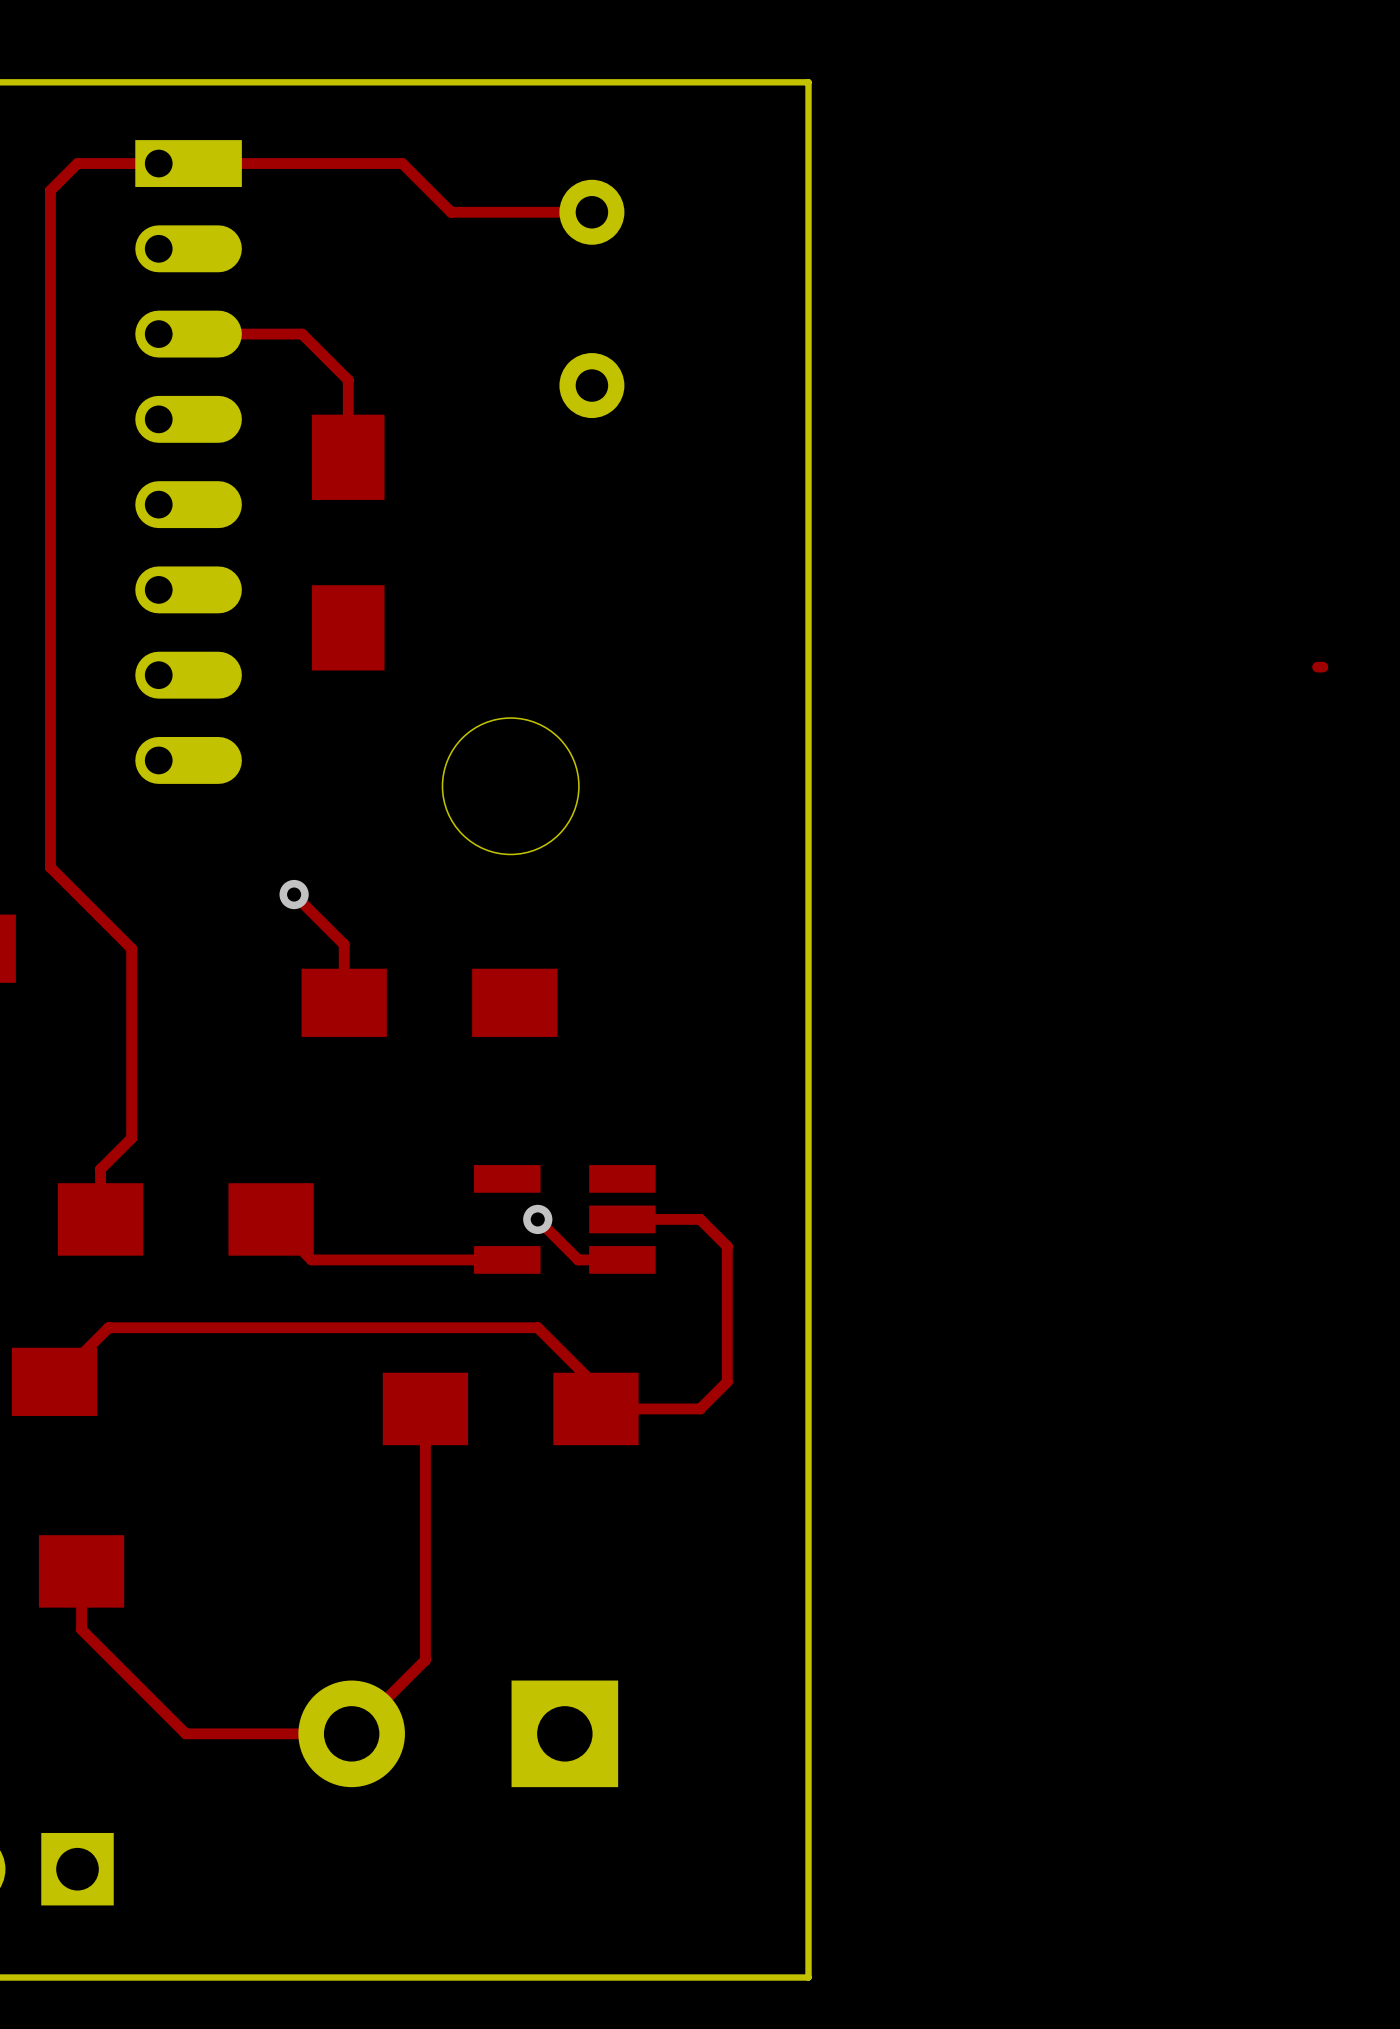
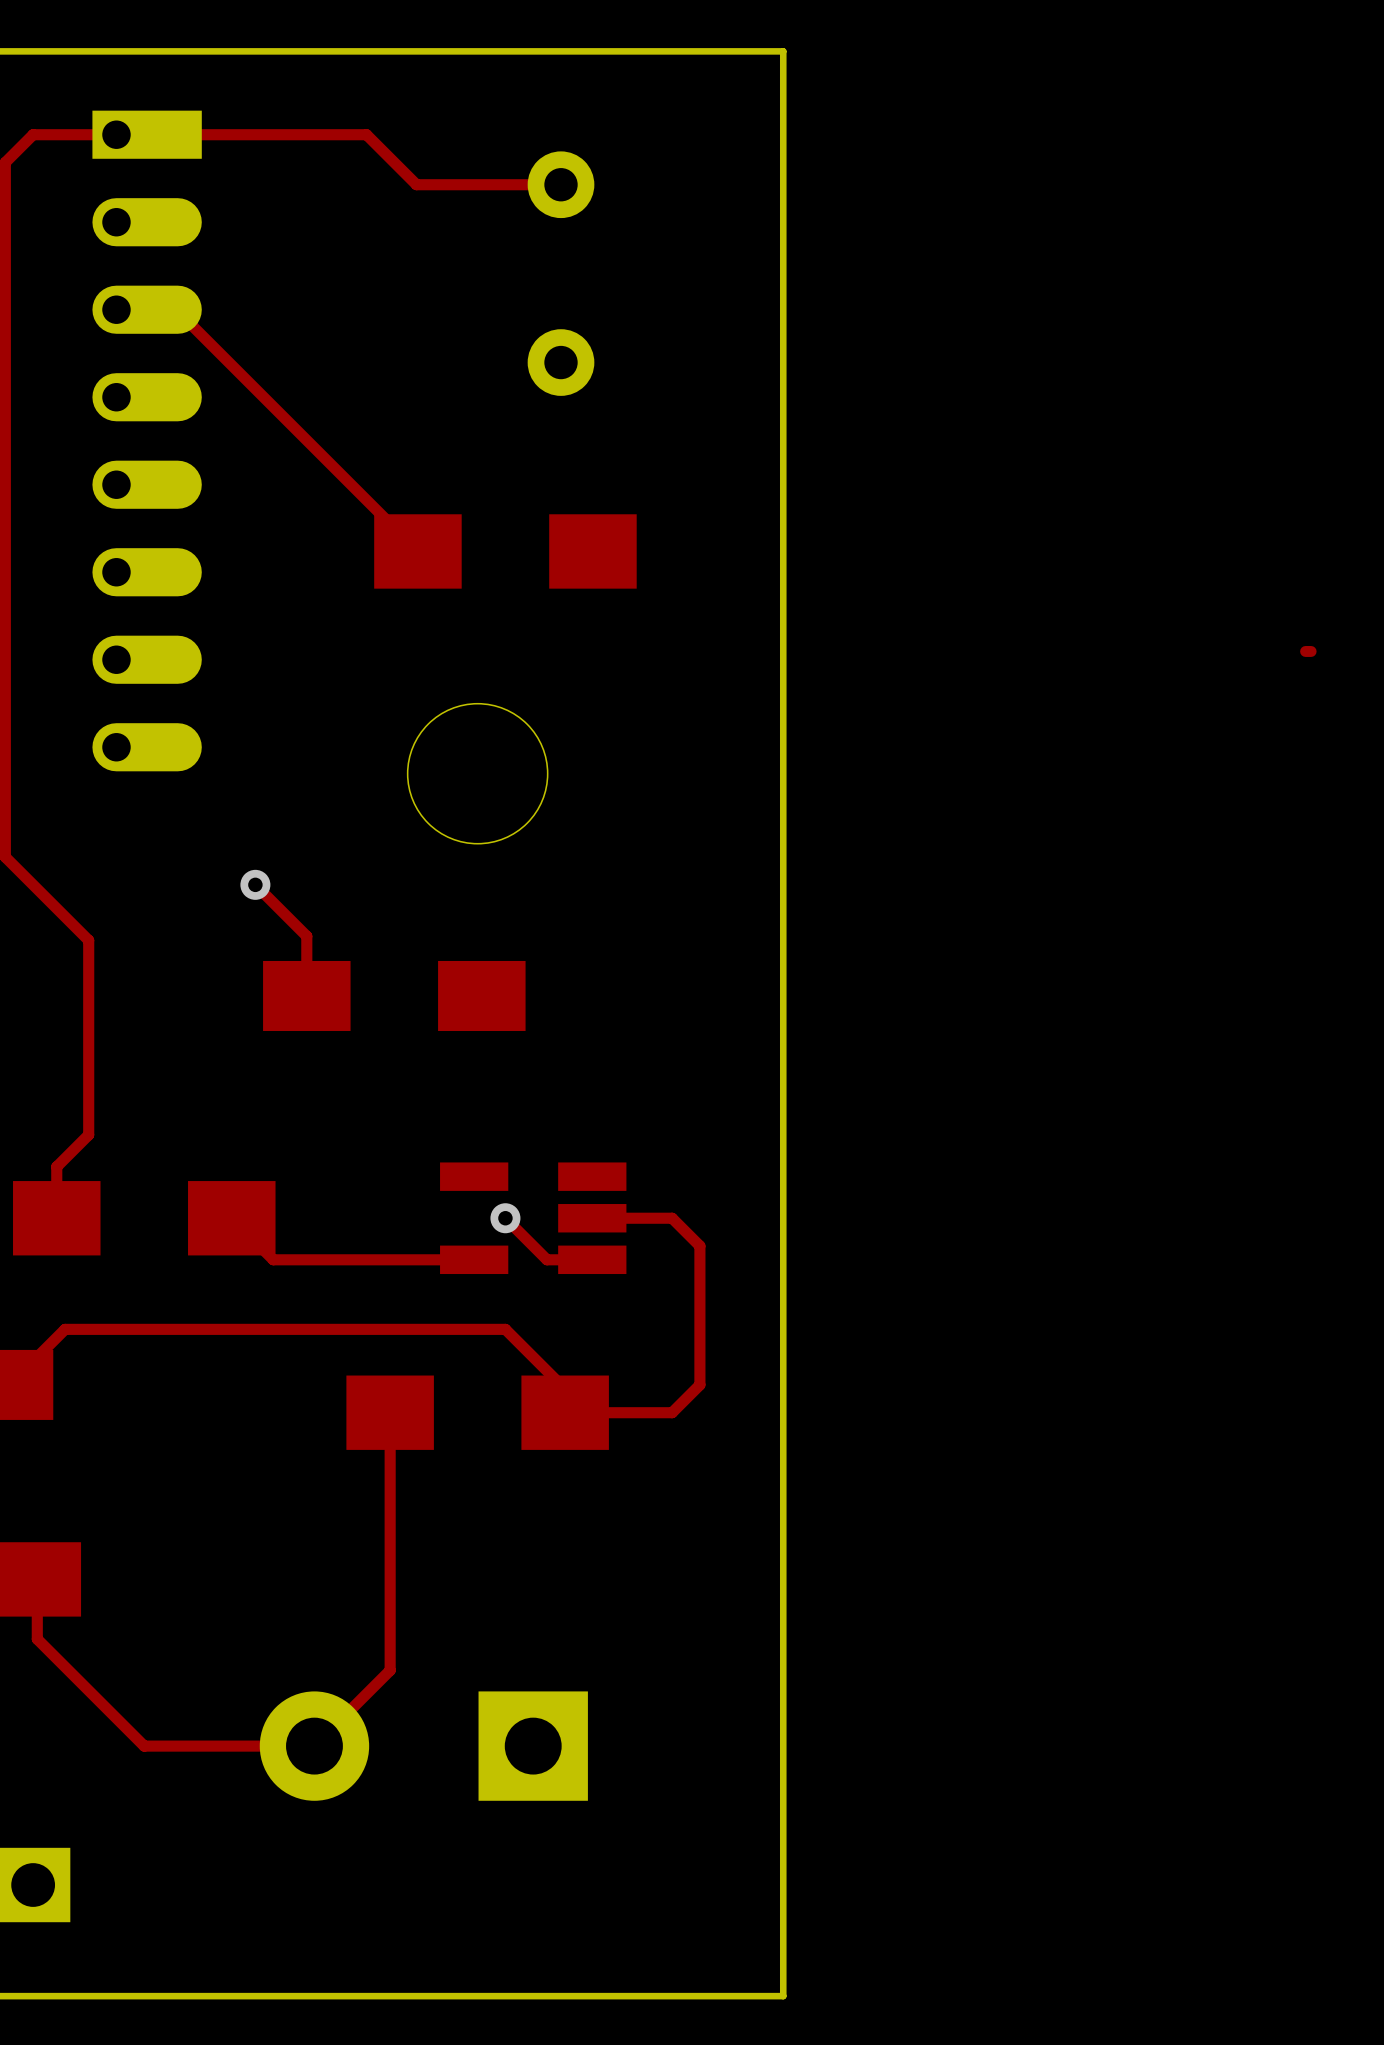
top track: (216, 334) (302, 334) (348, 380) (348, 457) -> (176, 309) (417, 551)
part rotation: 0° (348, 542) -> 90° clockwise (505, 551)
part position: (348, 542) -> (505, 551)

